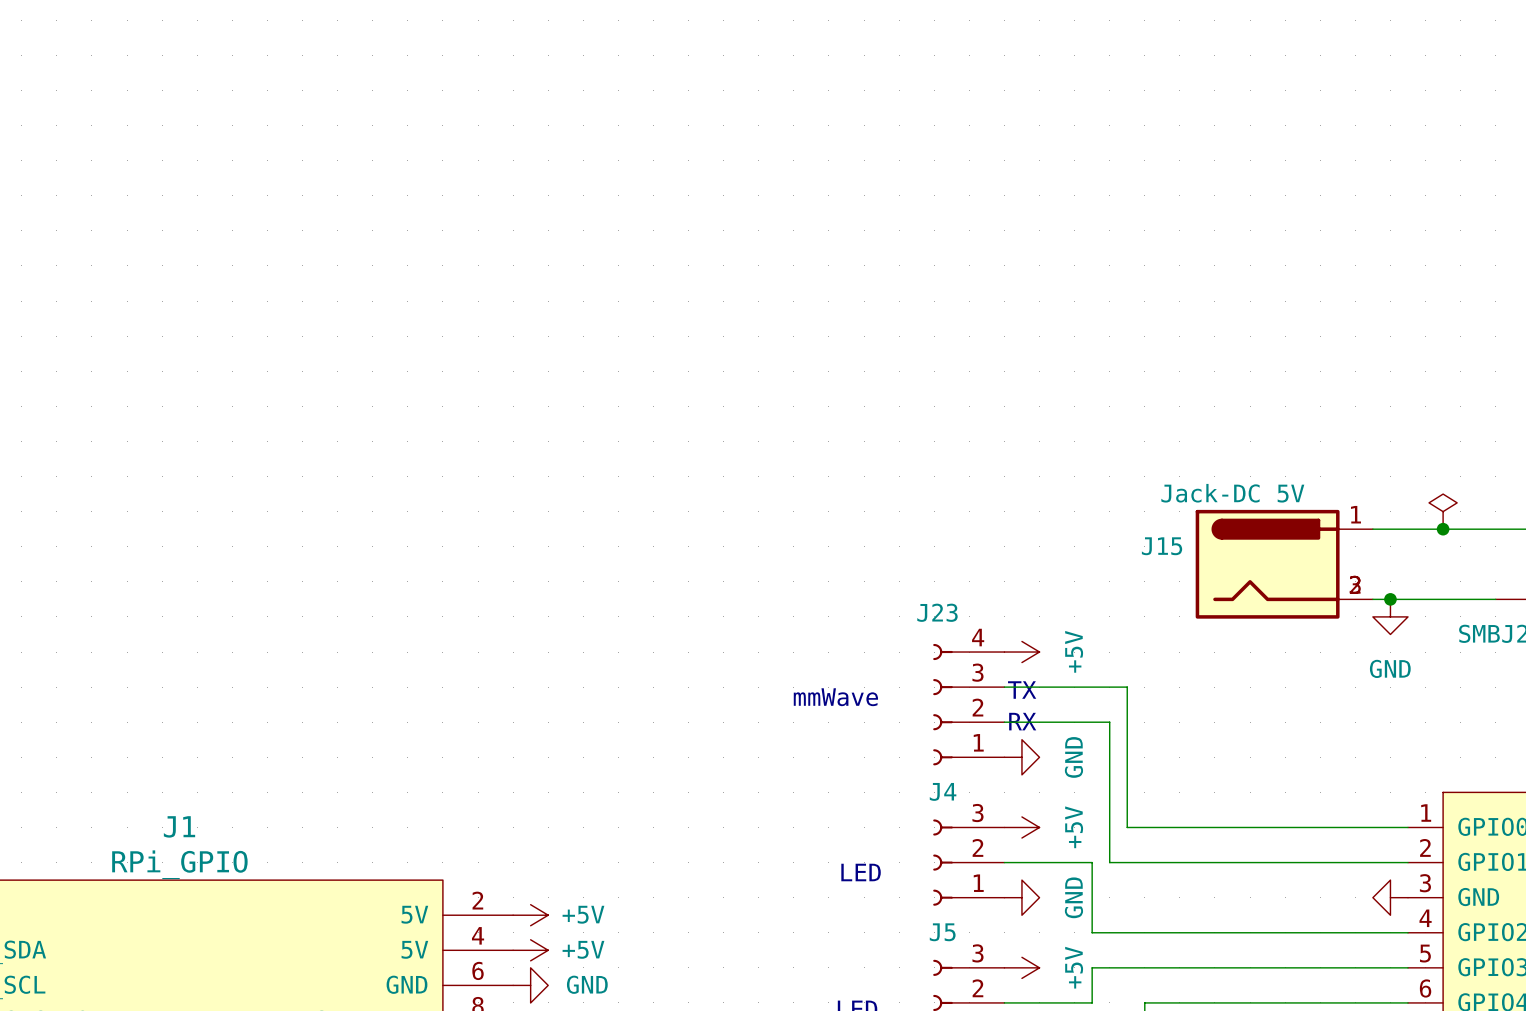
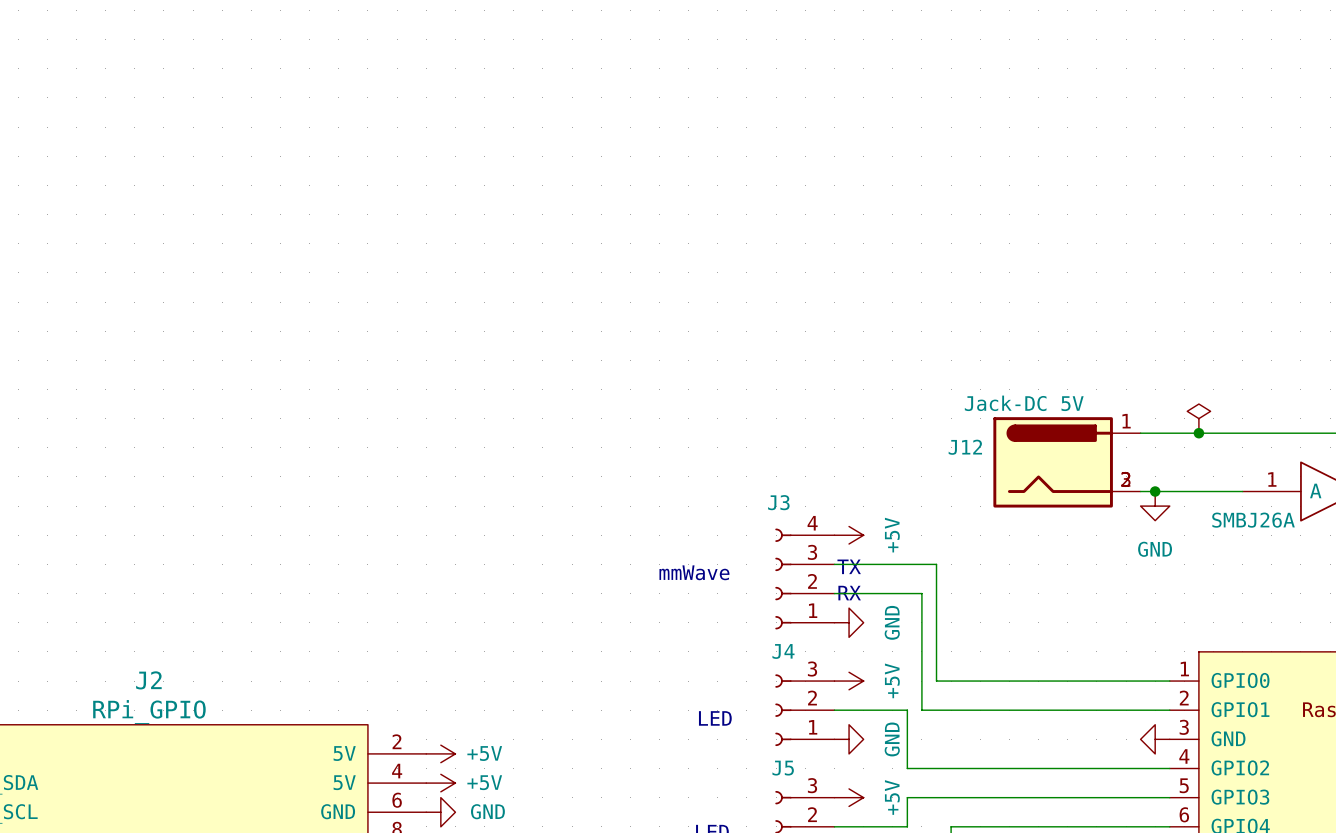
J15 name: J15 (1162, 546) -> J12 (965, 447)
J23 name: J23 (937, 612) -> J3 (778, 502)
J1 name: J1 (179, 826) -> J2 (148, 680)

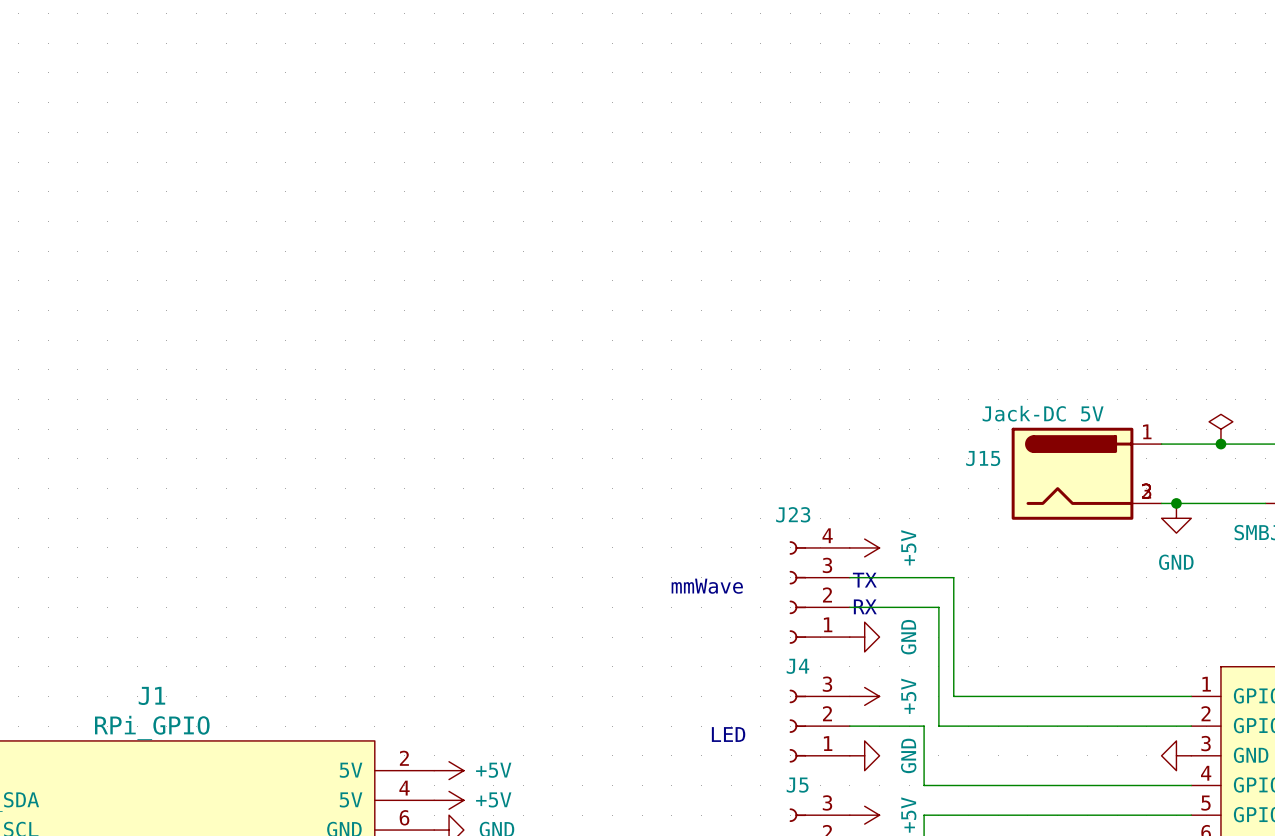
J12 name: J12 (965, 447) -> J15 (983, 458)
J3 name: J3 (778, 502) -> J23 (793, 514)
J2 name: J2 (148, 680) -> J1 (151, 695)

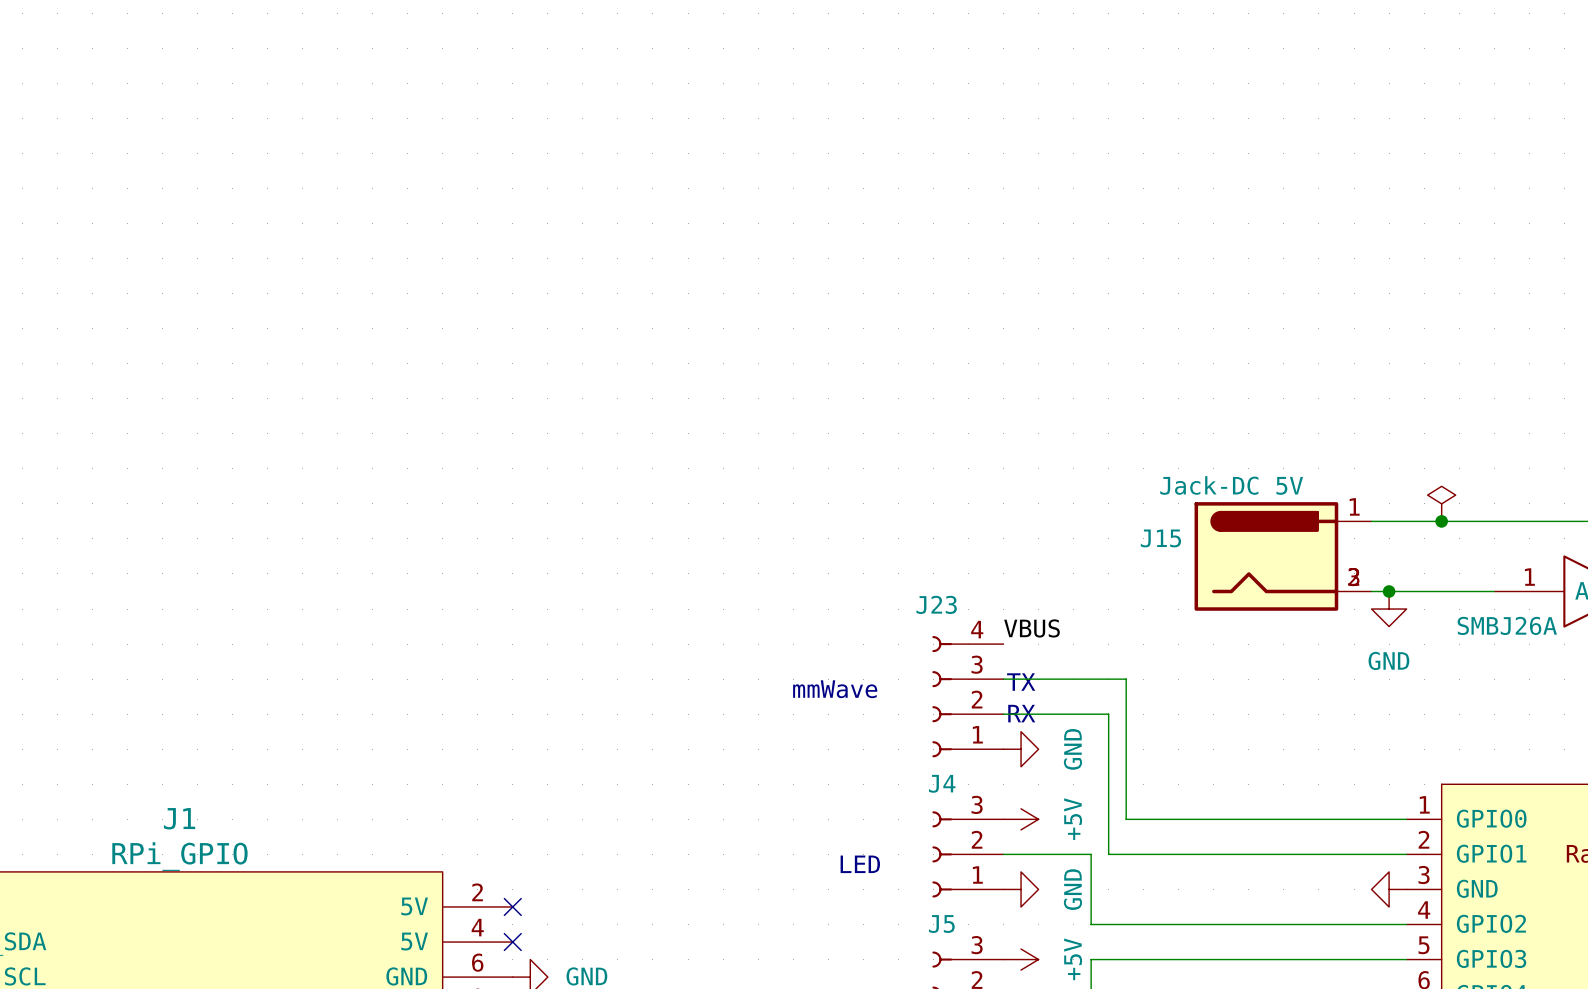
label: none -> VBUS (1031, 628)
power symbol: +5V (864, 547) -> none
no-connect mark: none -> (512, 906)
power symbol: +5V (449, 770) -> none
no-connect mark: none -> (512, 942)
power symbol: +5V (449, 800) -> none

